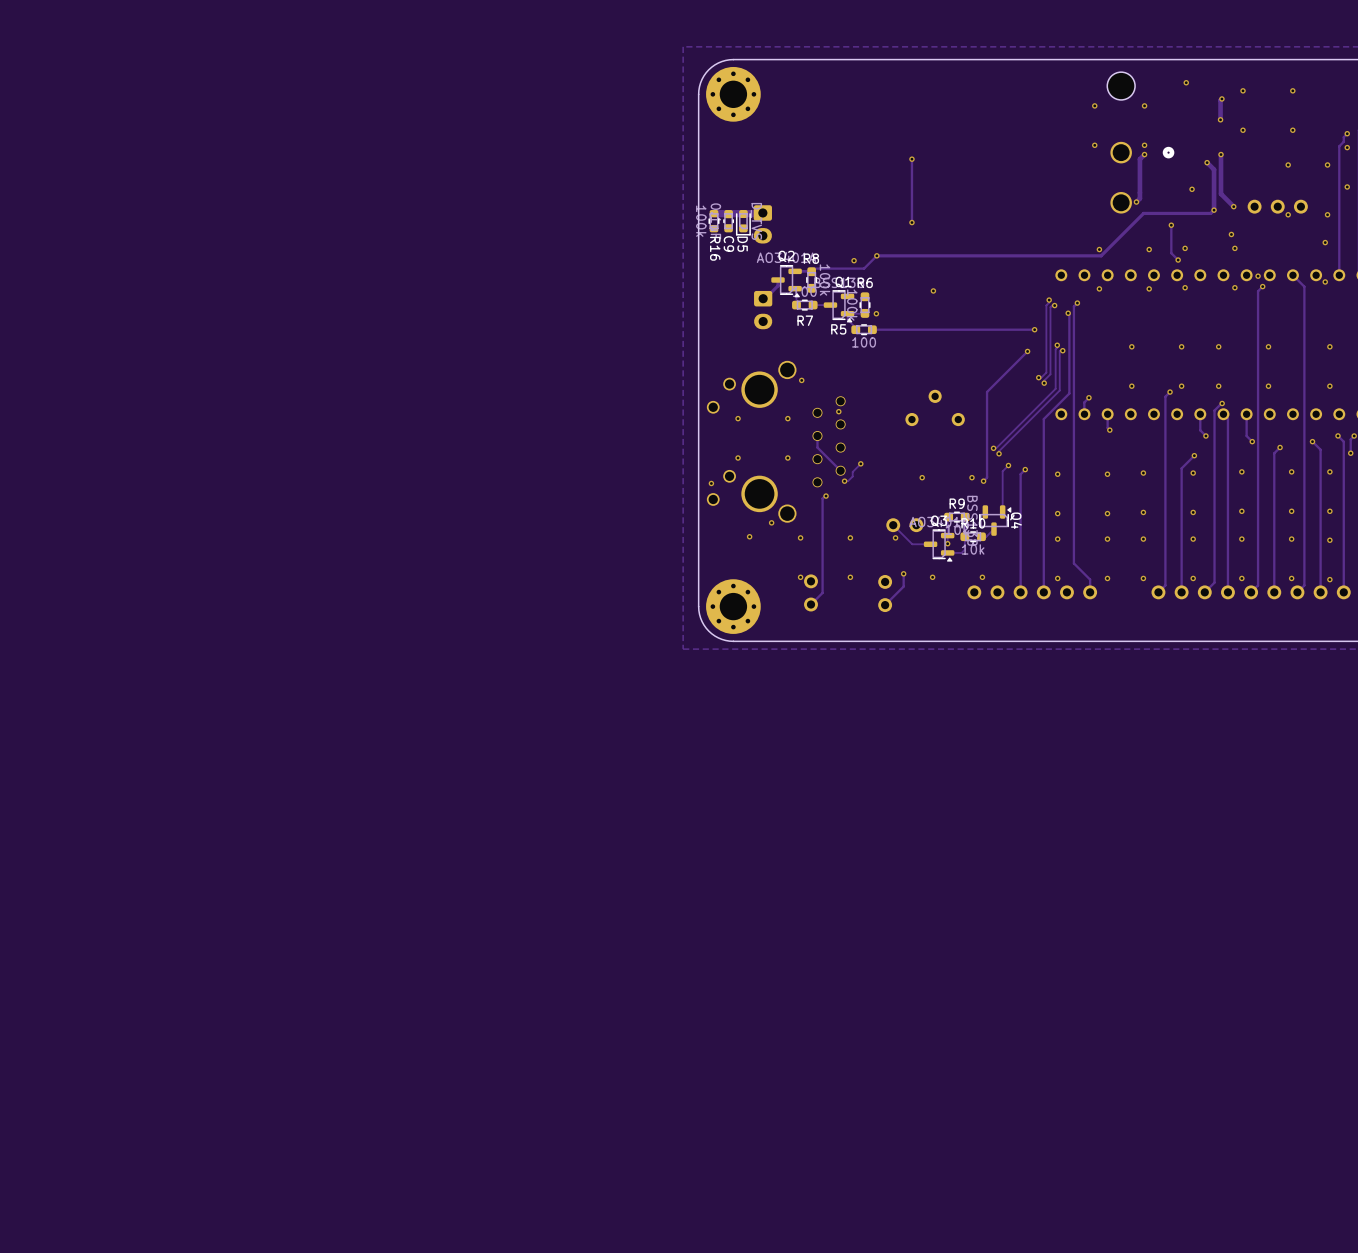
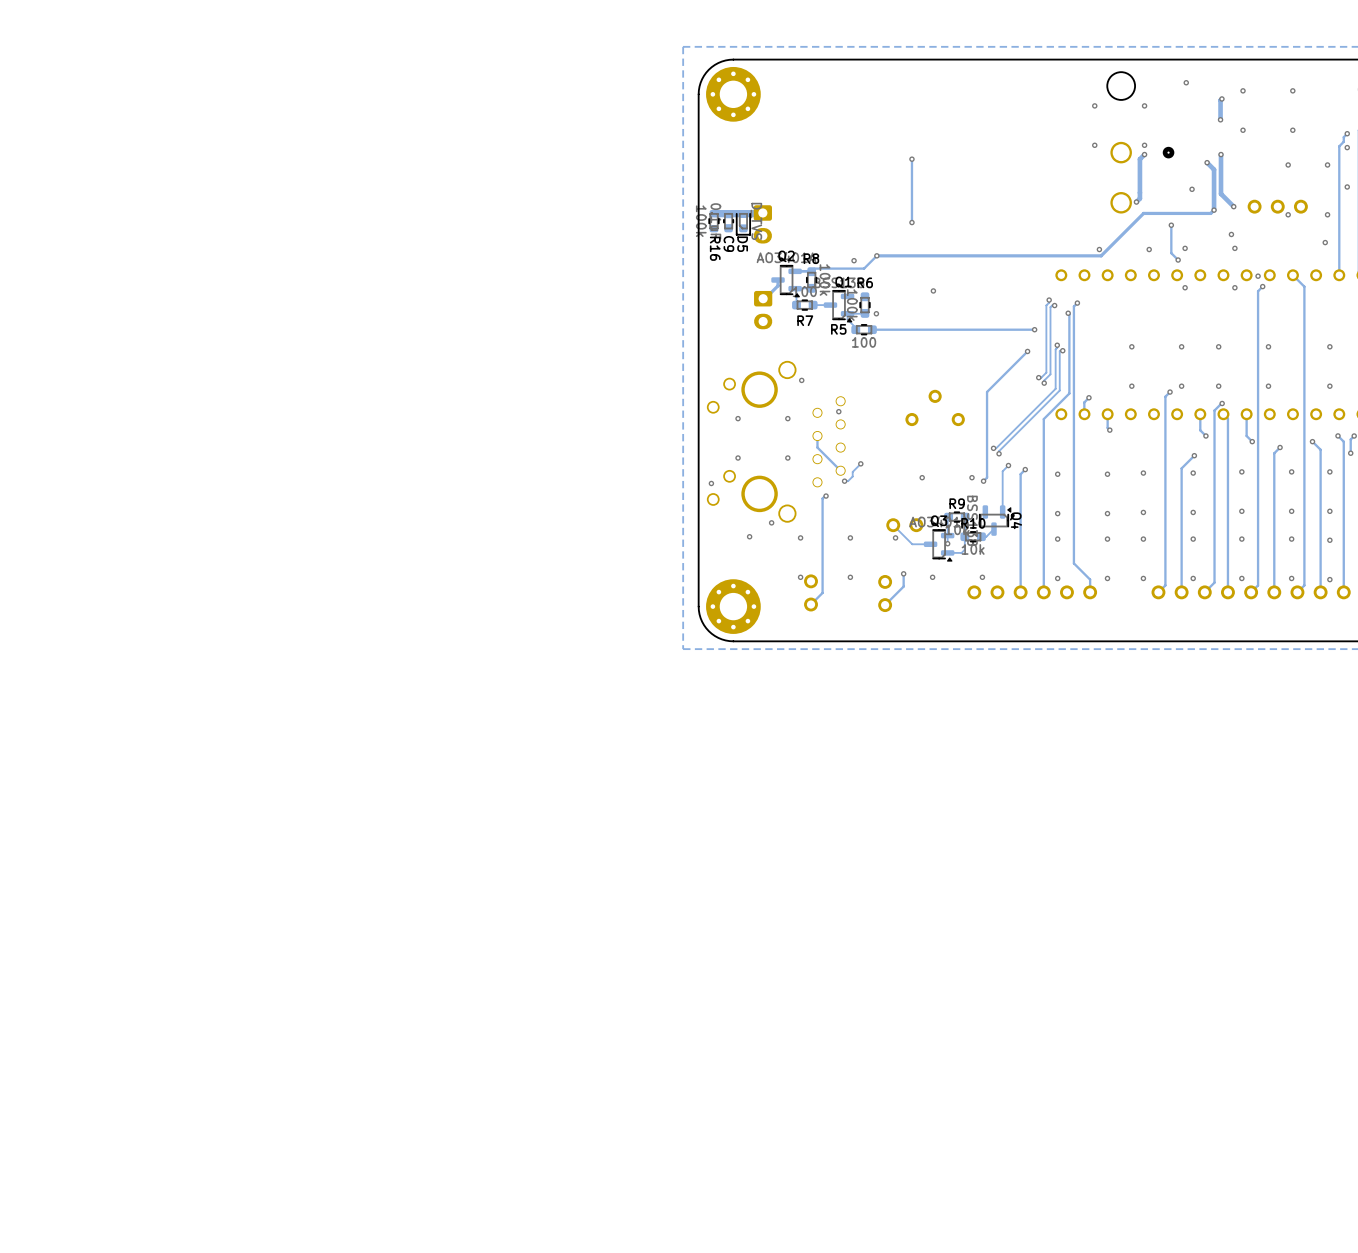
via: (1325, 281) -> none
via: (1099, 288) -> none
via: (1149, 288) -> none

